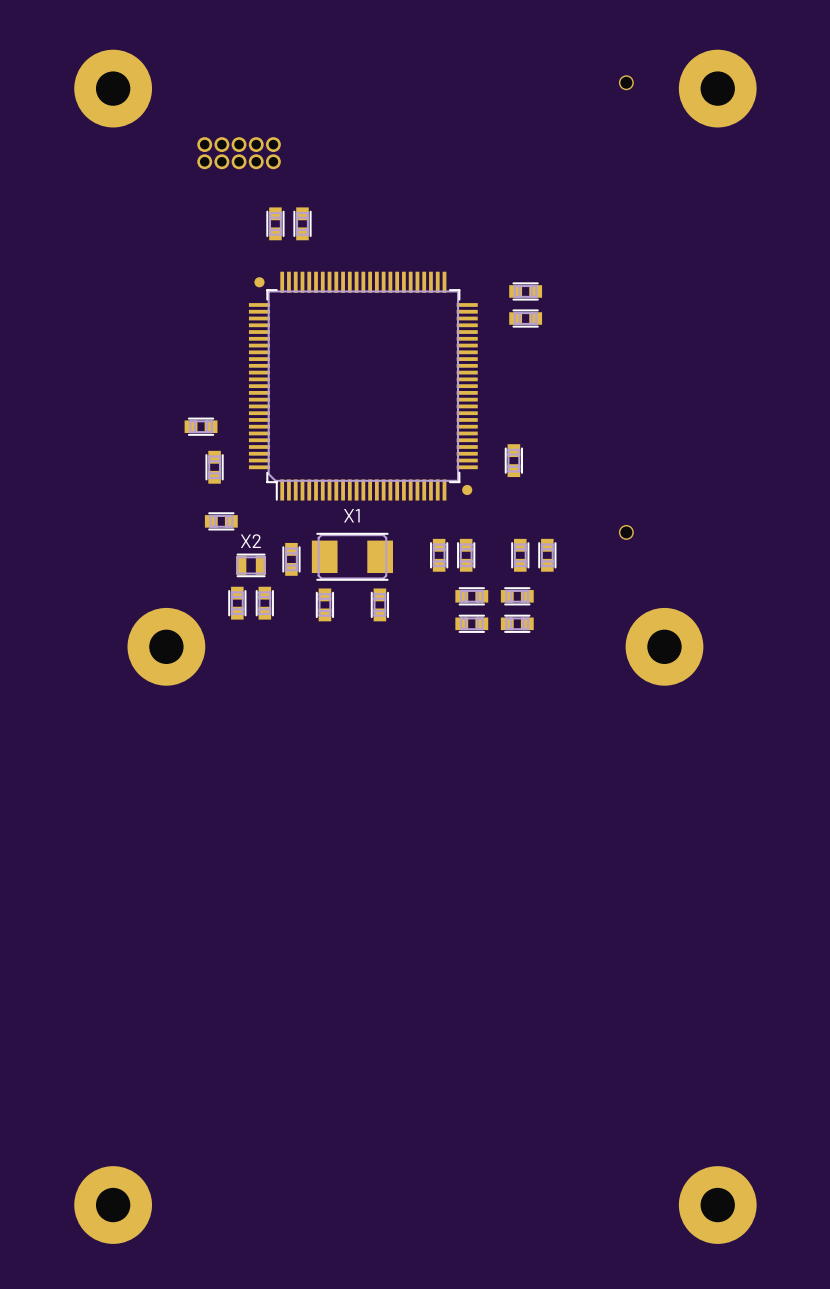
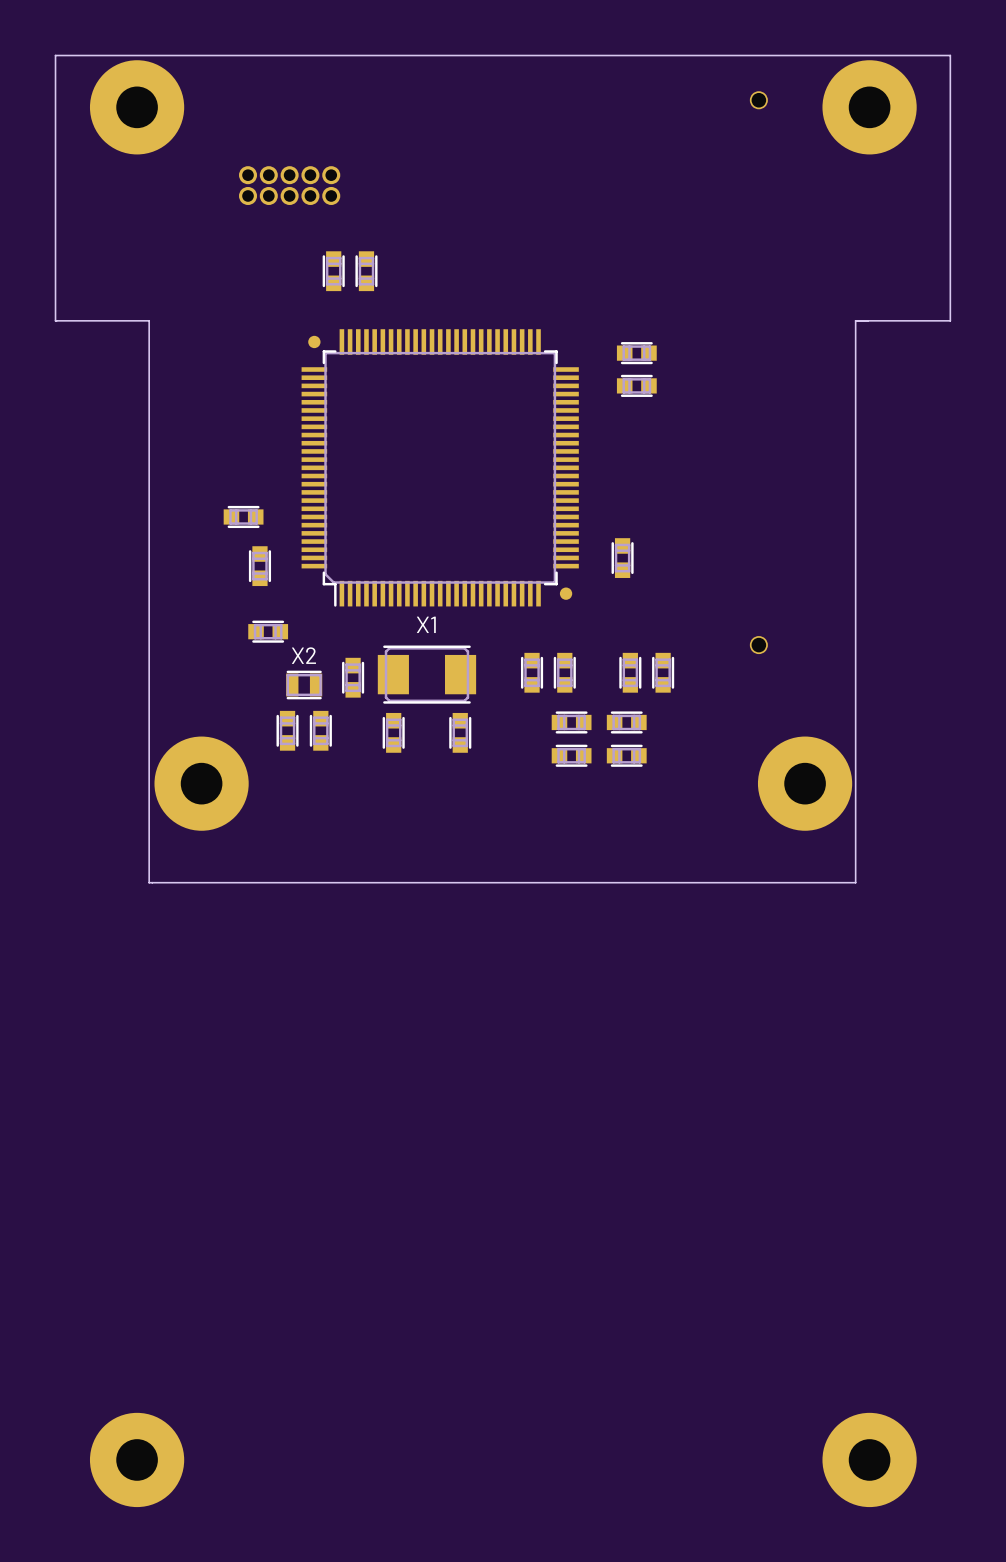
board edge: none -> (55, 55) (55, 320) (149, 320) (149, 882) (855, 882) (855, 320) (950, 320) (950, 55) (55, 55)

